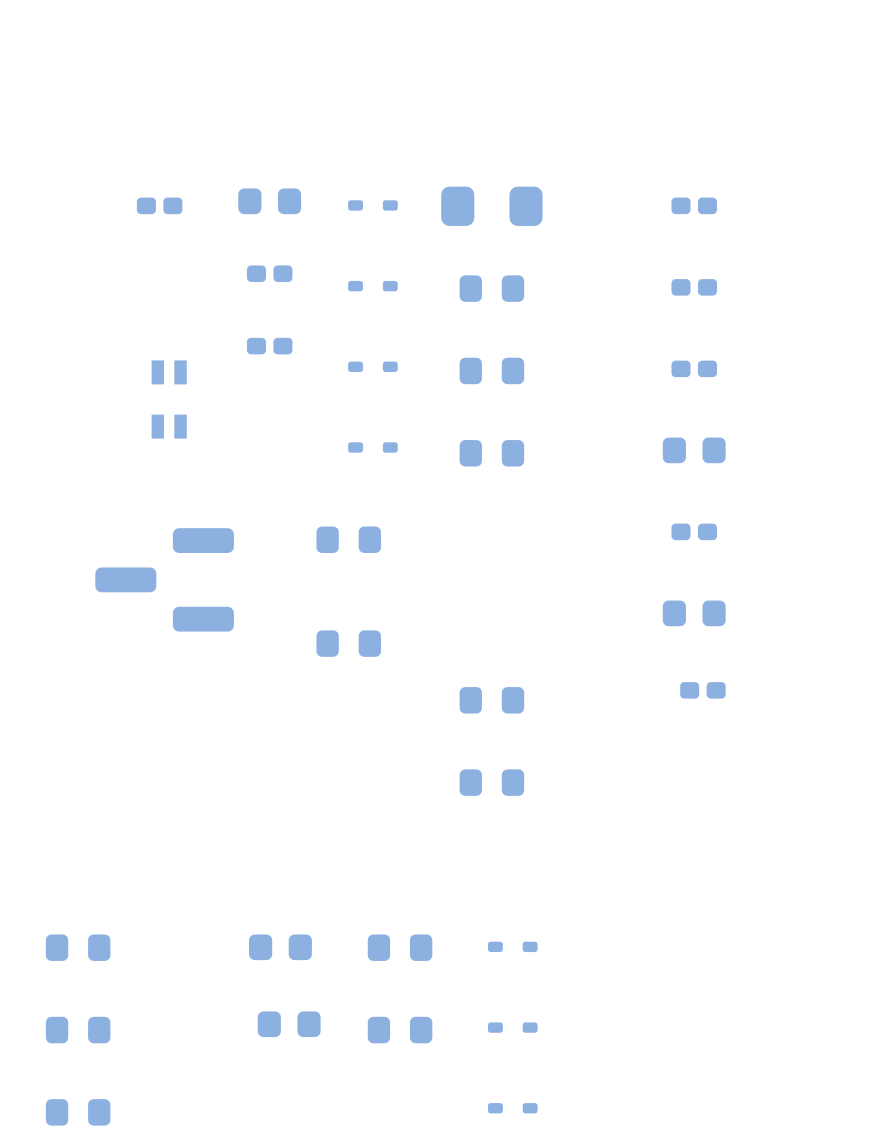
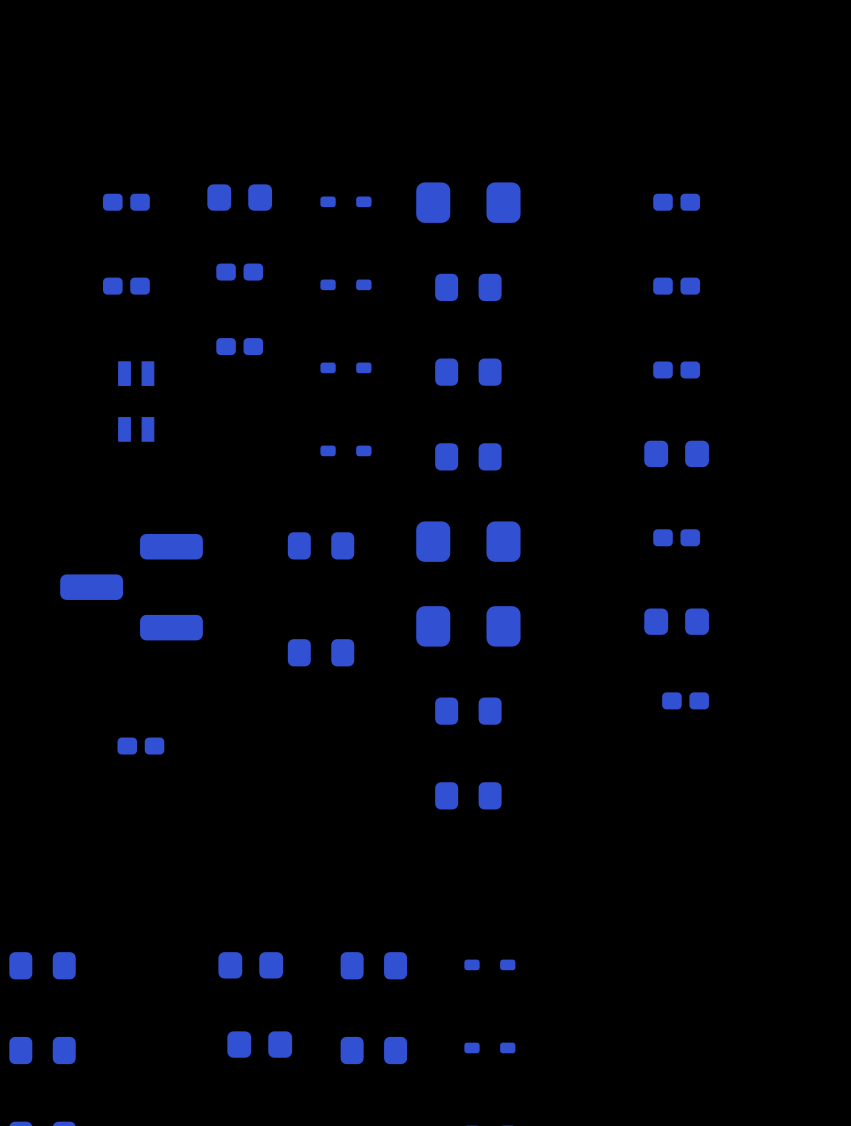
part: none -> (126, 286)
part: none -> (468, 541)
part: none -> (468, 626)
part: none -> (140, 746)

